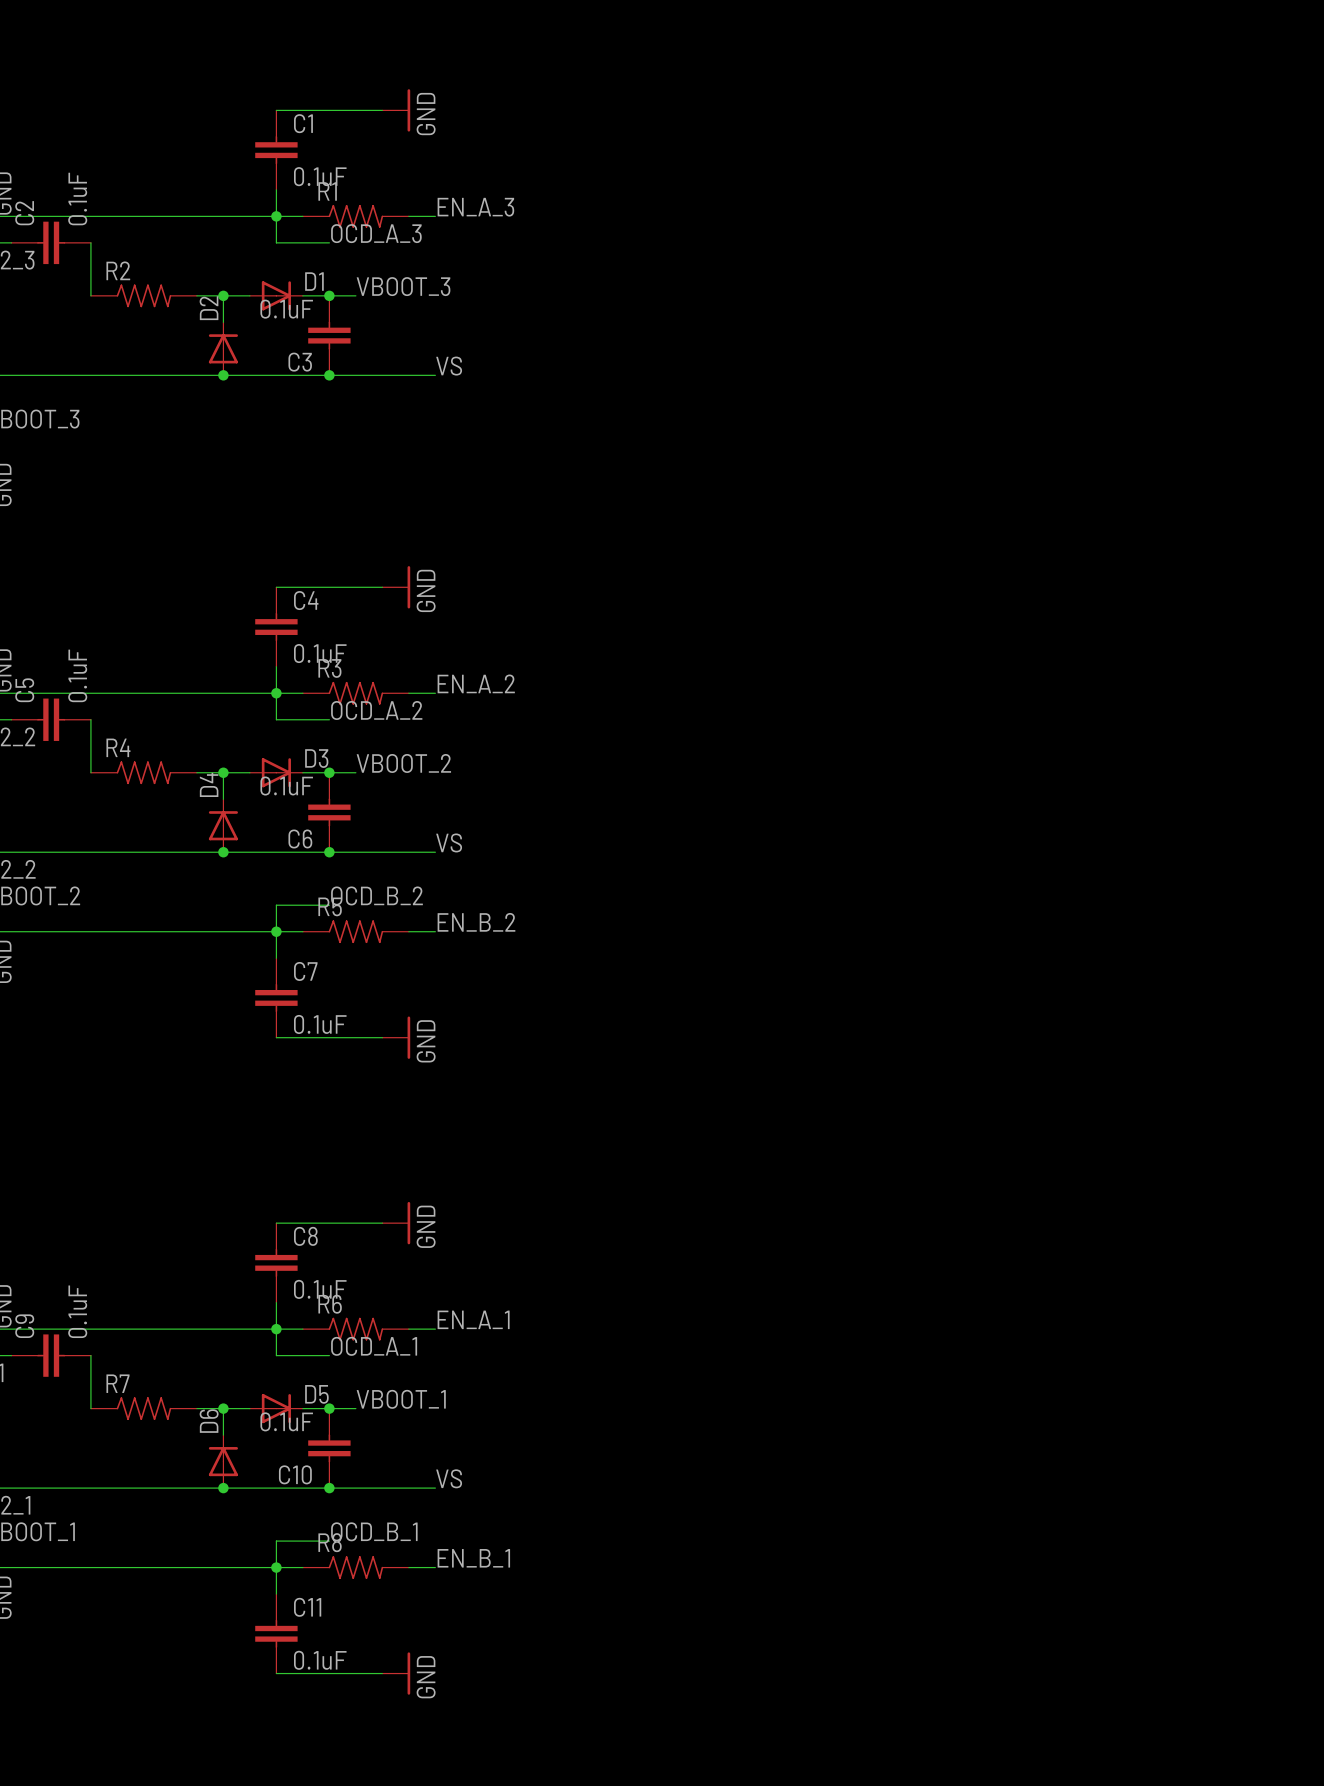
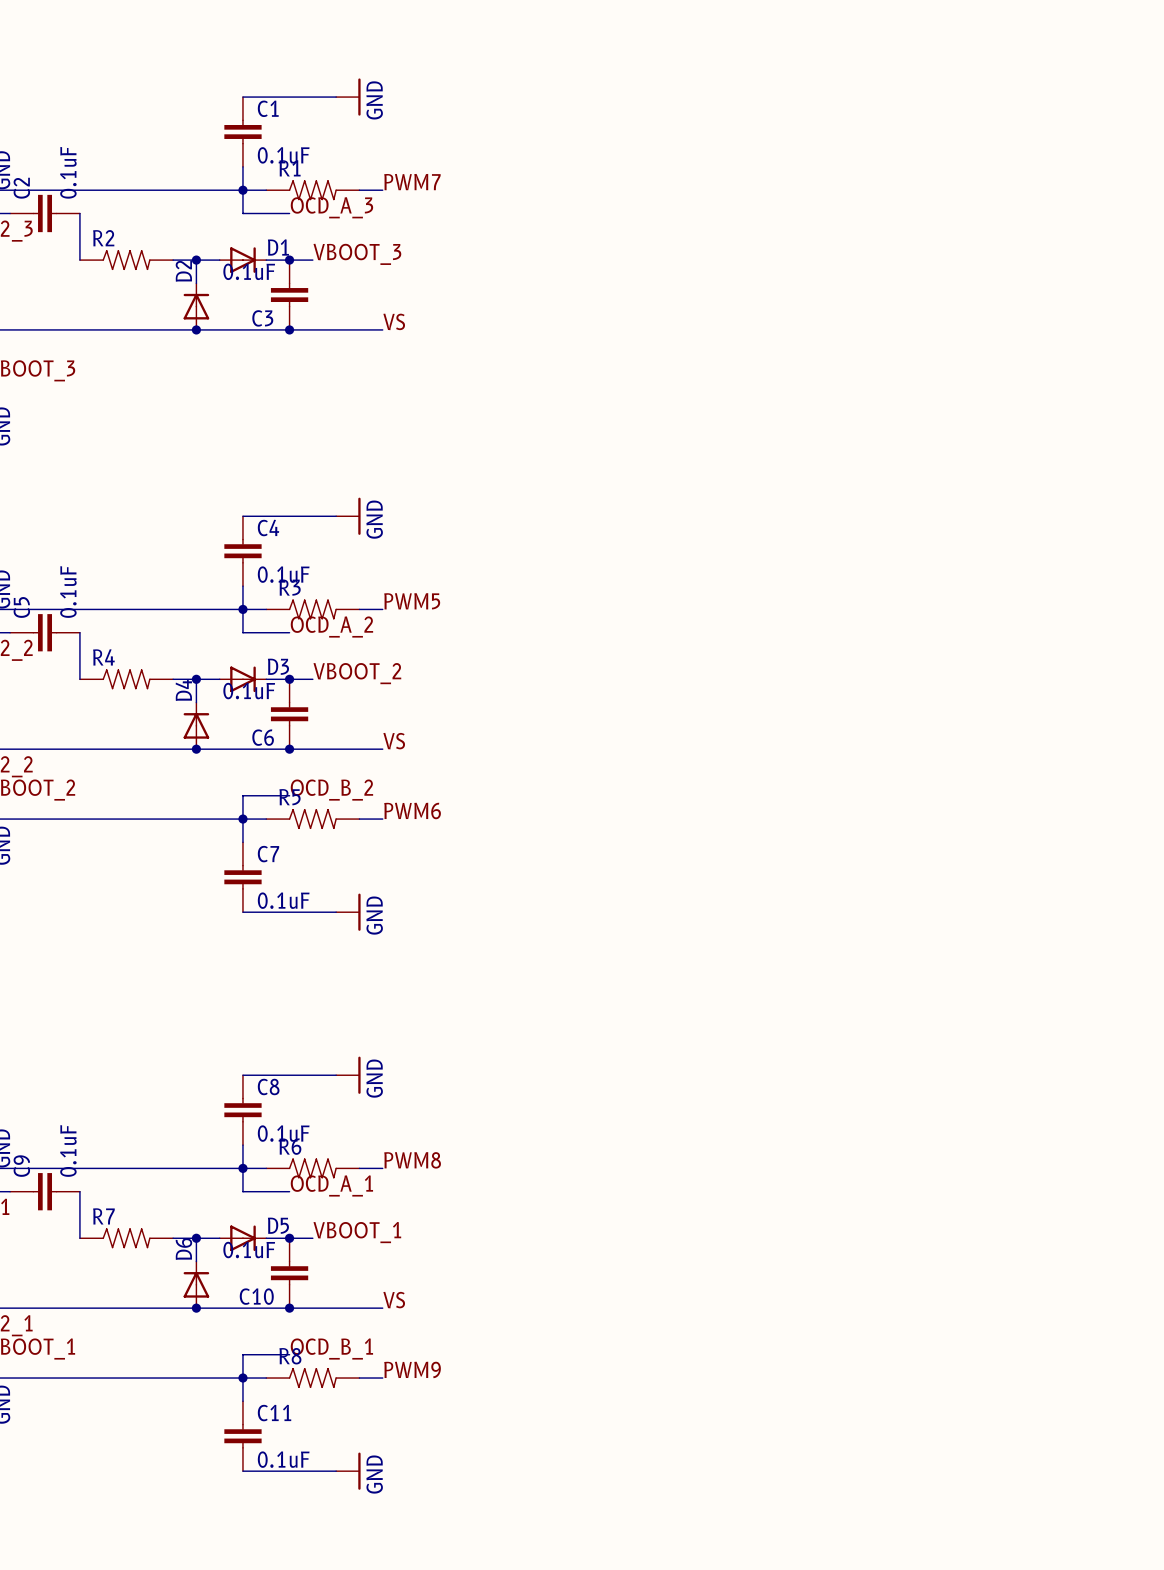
label: EN_A_3 (475, 207) -> PWM7 (412, 182)
label: EN_A_2 (476, 683) -> PWM5 (412, 601)
label: EN_B_2 (476, 922) -> PWM6 (412, 810)
label: EN_A_1 (473, 1319) -> PWM8 (412, 1160)
label: EN_B_1 (473, 1558) -> PWM9 (412, 1369)

